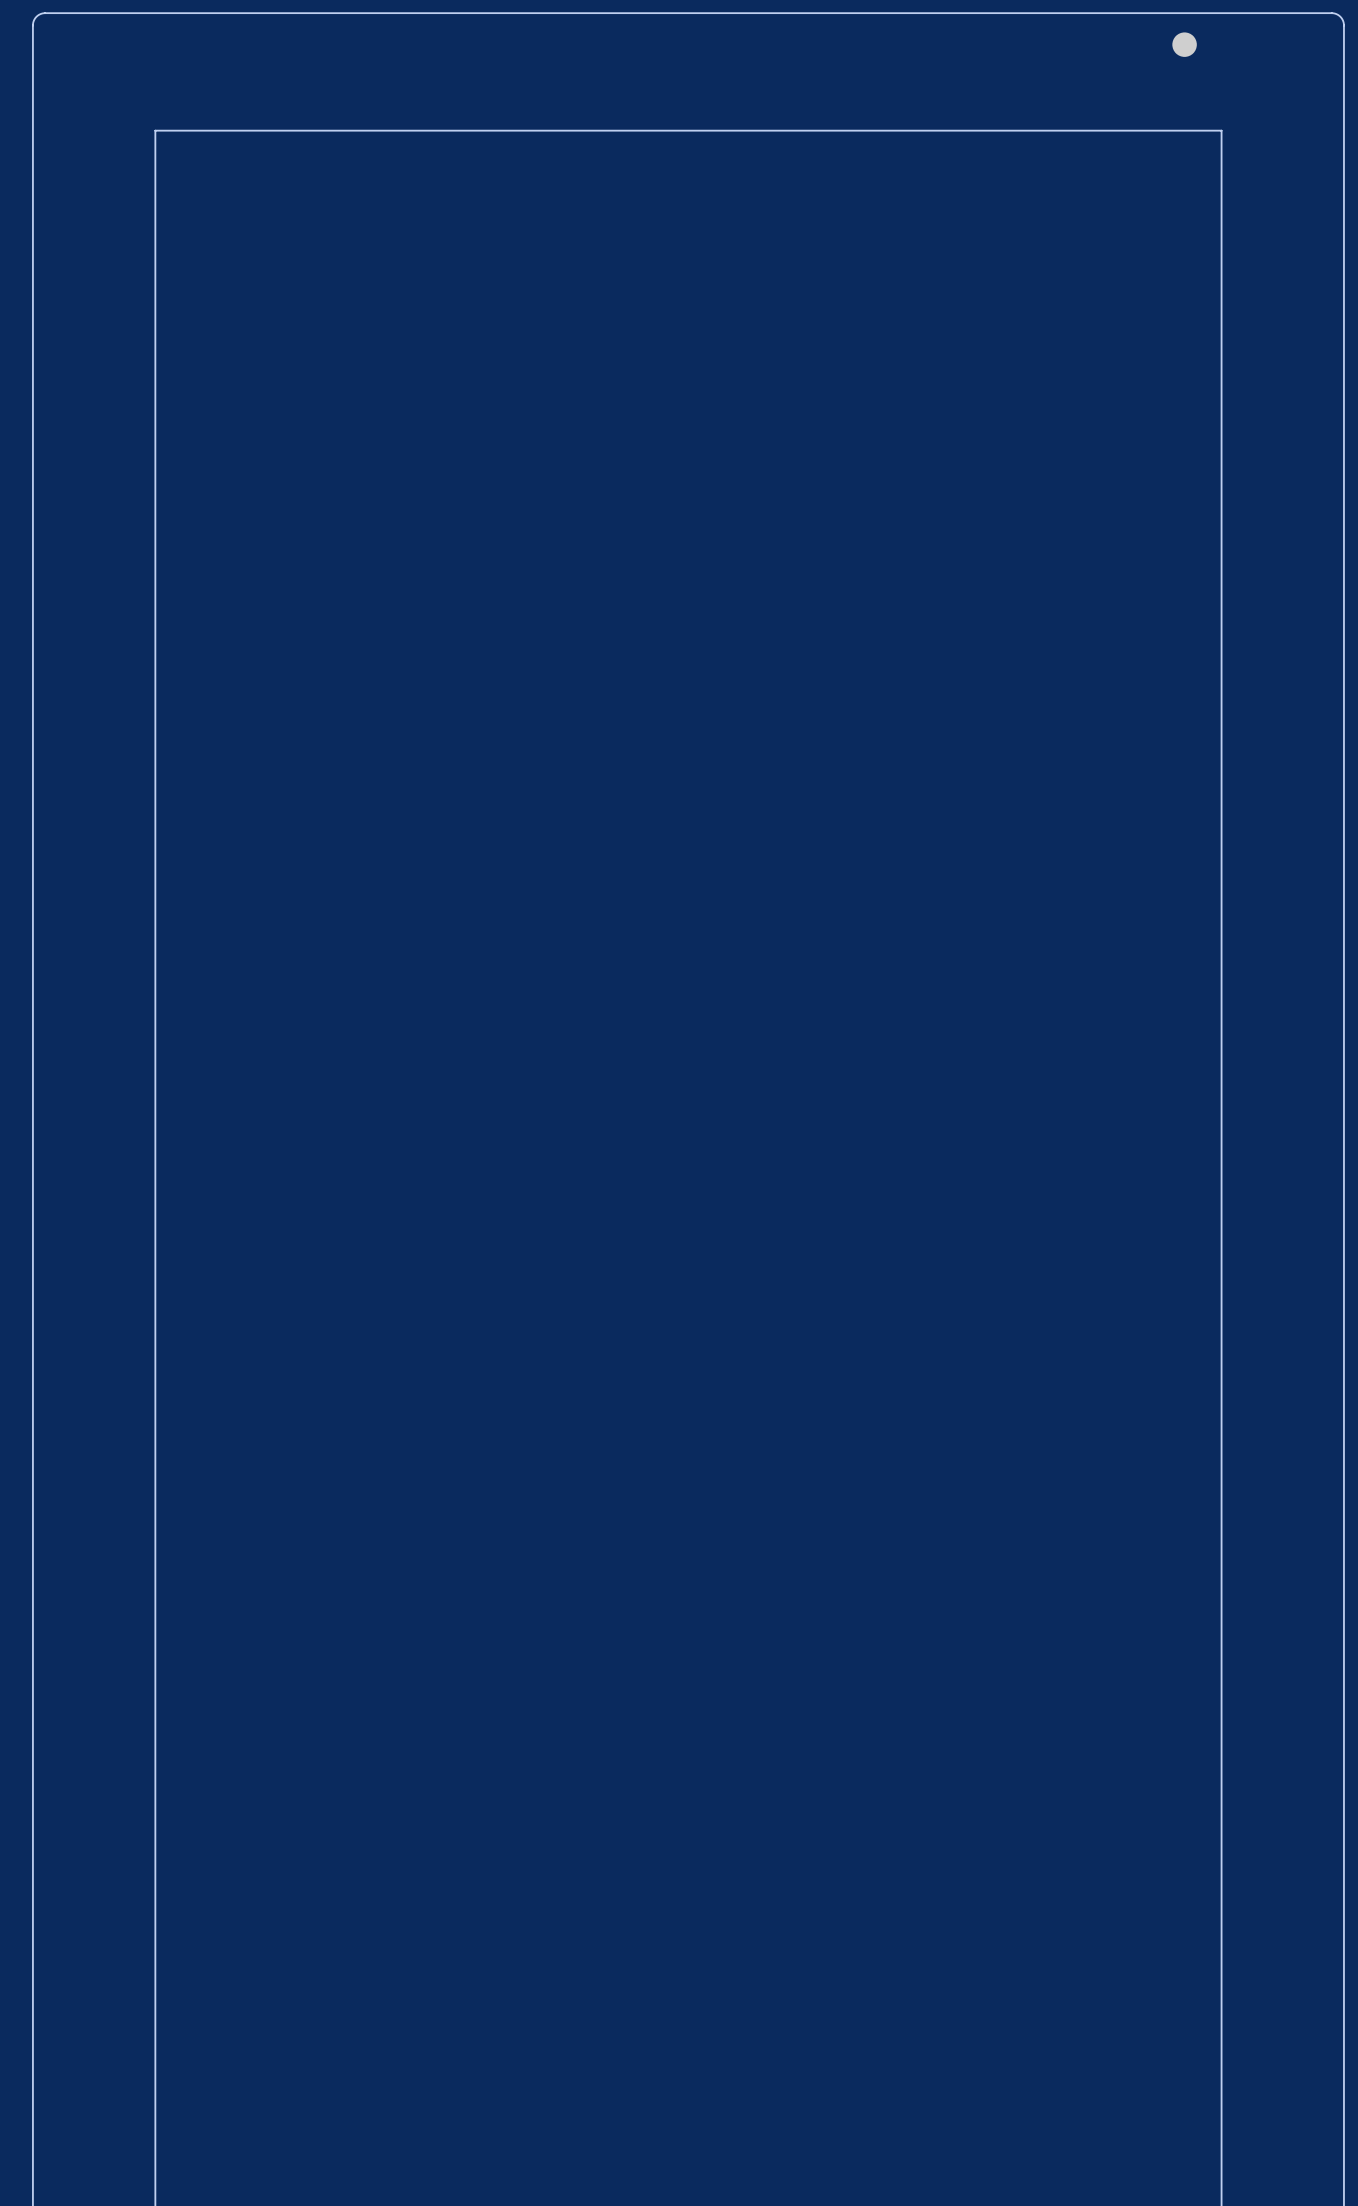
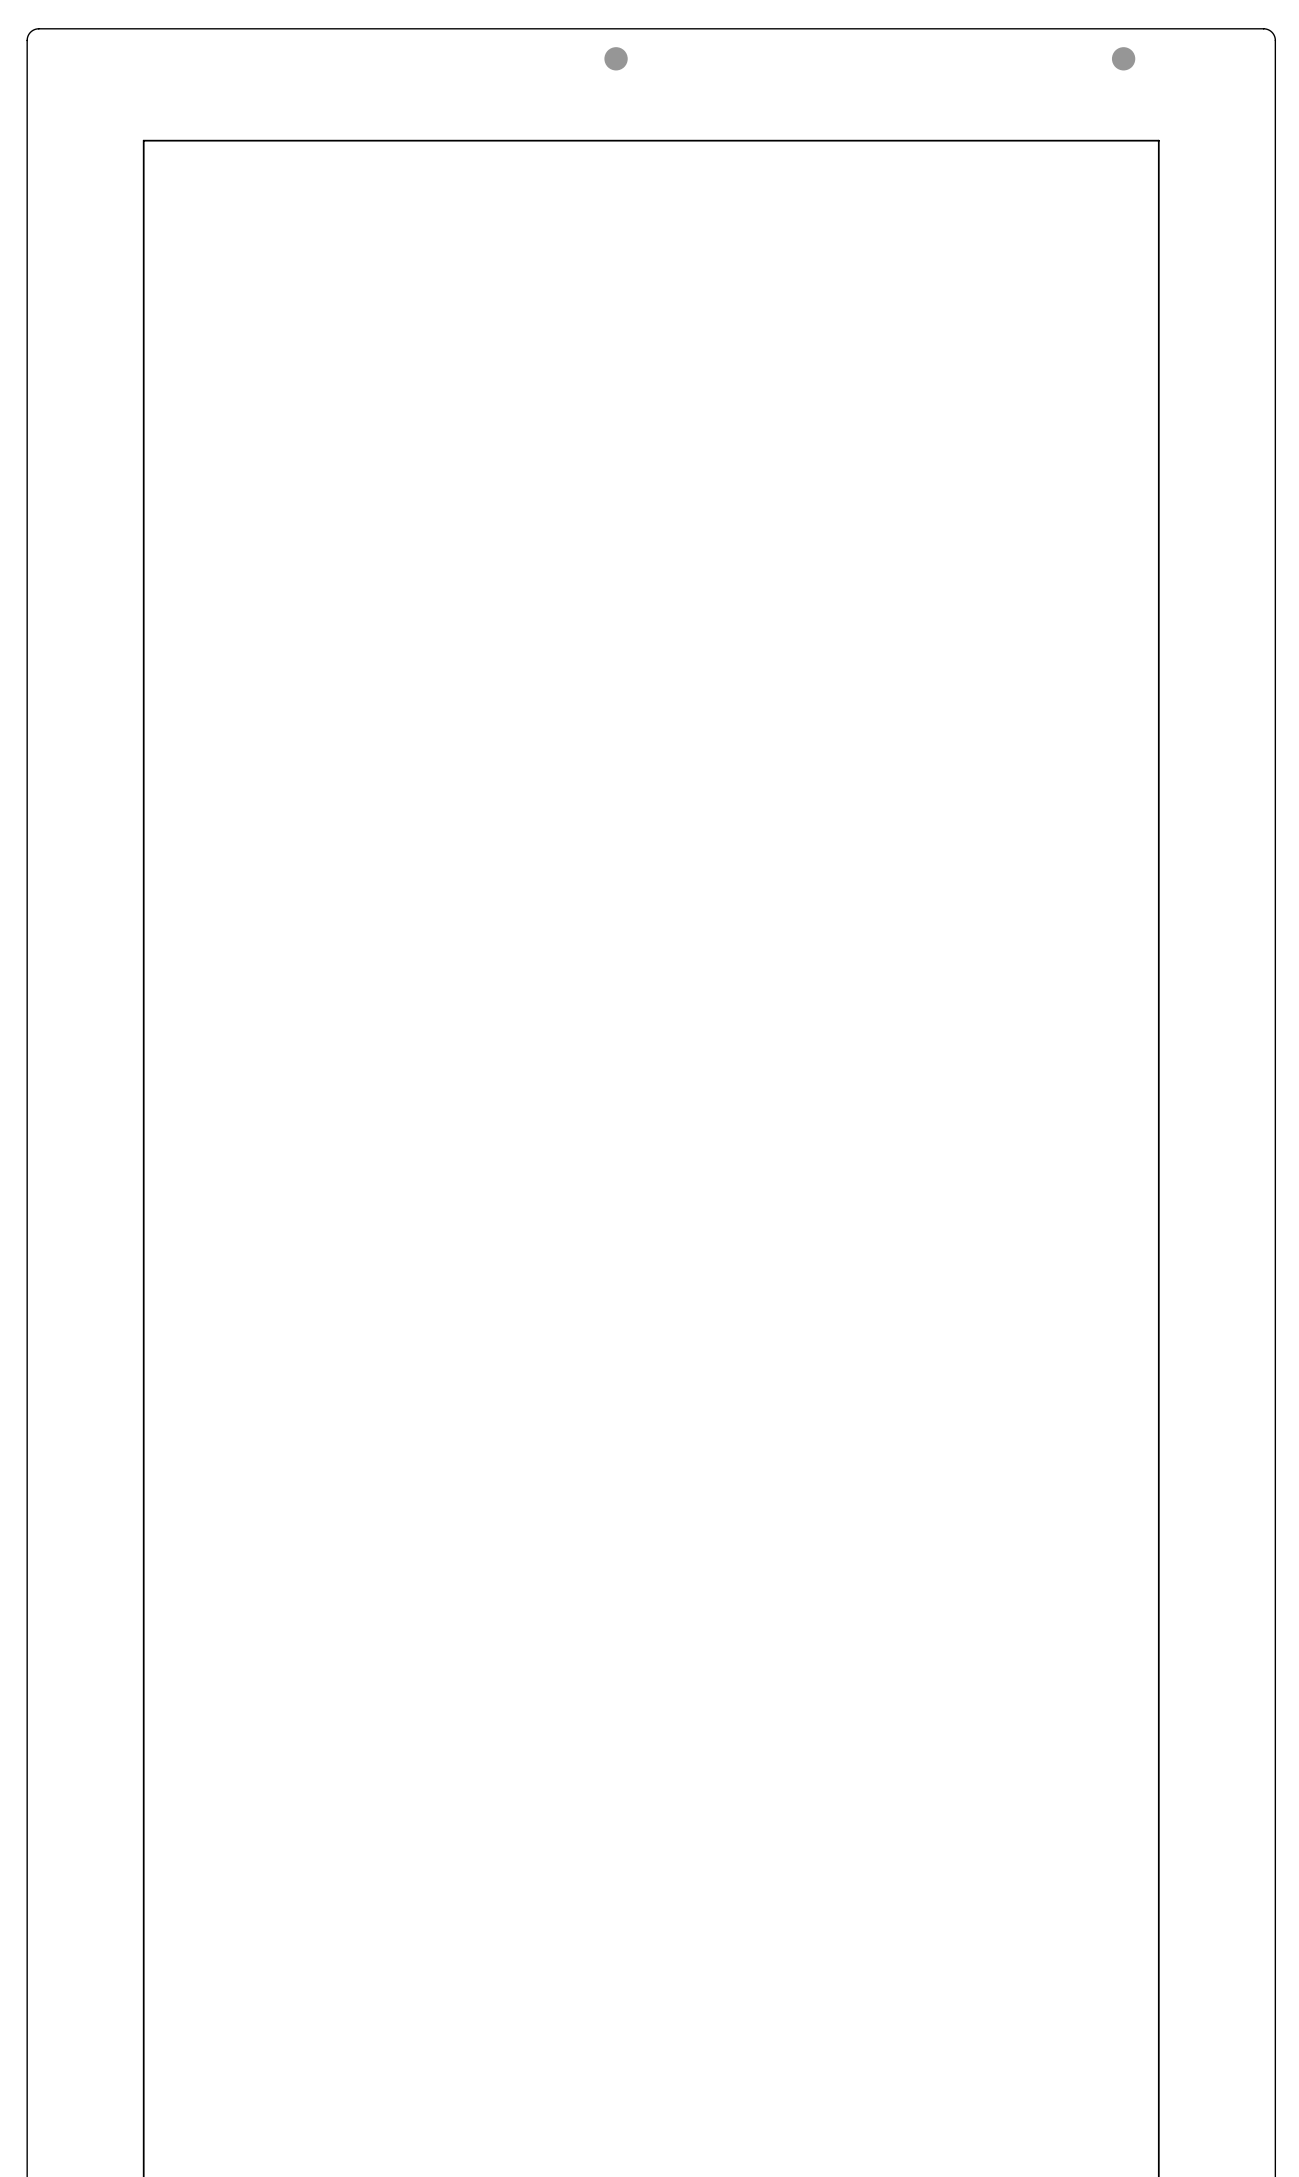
part: none -> (616, 58)

